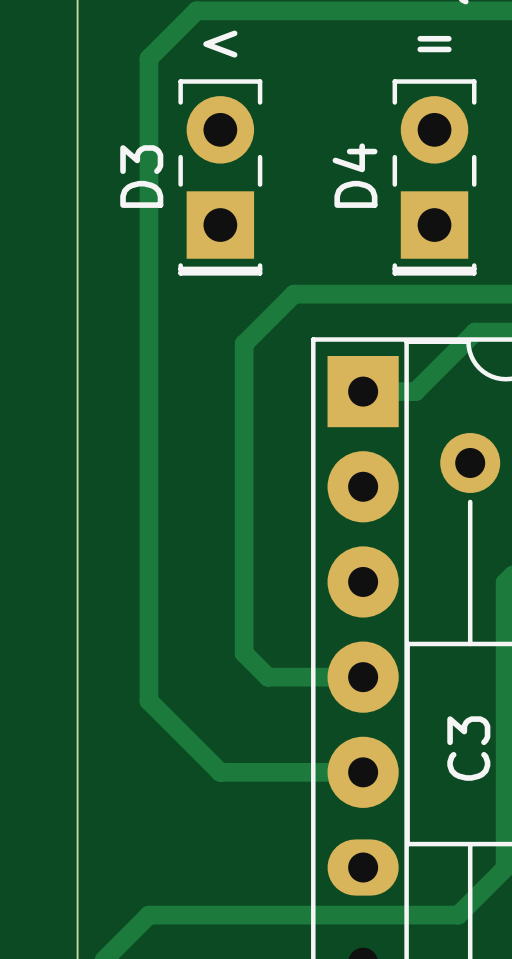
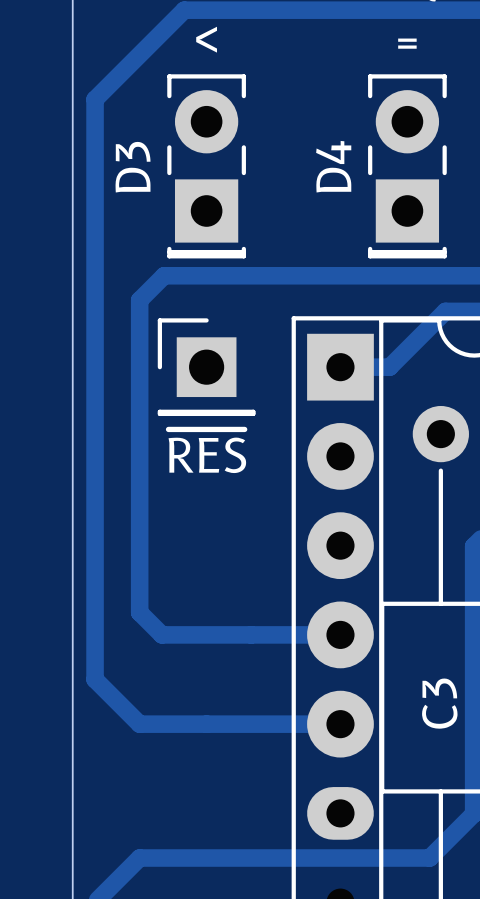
track: (148, 58) (148, 320) -> (275, 275) (164, 275) (139, 300)
track: none -> (139, 54) (95, 99) (95, 679) (139, 724) (206, 724)
track: (294, 294) (244, 344) (244, 653) (267, 677) -> none
part: none -> (206, 367)
text: none -> ~{RES} (207, 451)
track: (148, 653) (148, 700) (220, 772) -> (139, 612) (161, 634) (251, 634)

